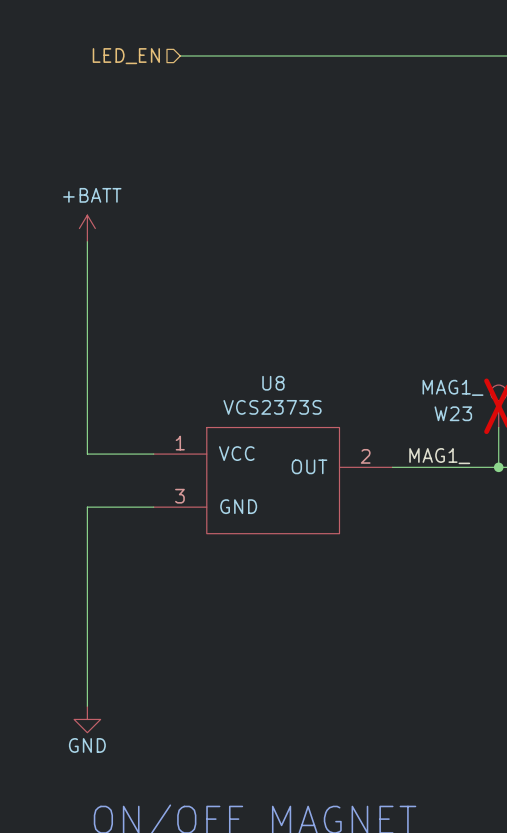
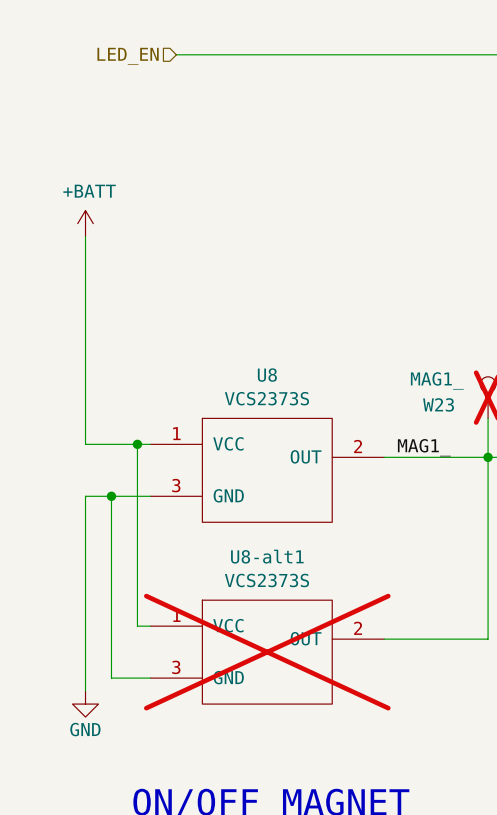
wire: none -> (137, 444) (137, 626) (150, 626)
junction: none -> (137, 444)
wire: none -> (488, 457) (488, 639) (384, 639)
wire: none -> (111, 496) (111, 678) (150, 678)
junction: none -> (111, 496)
U8-alt1: none -> VCS2373S (267, 652)

